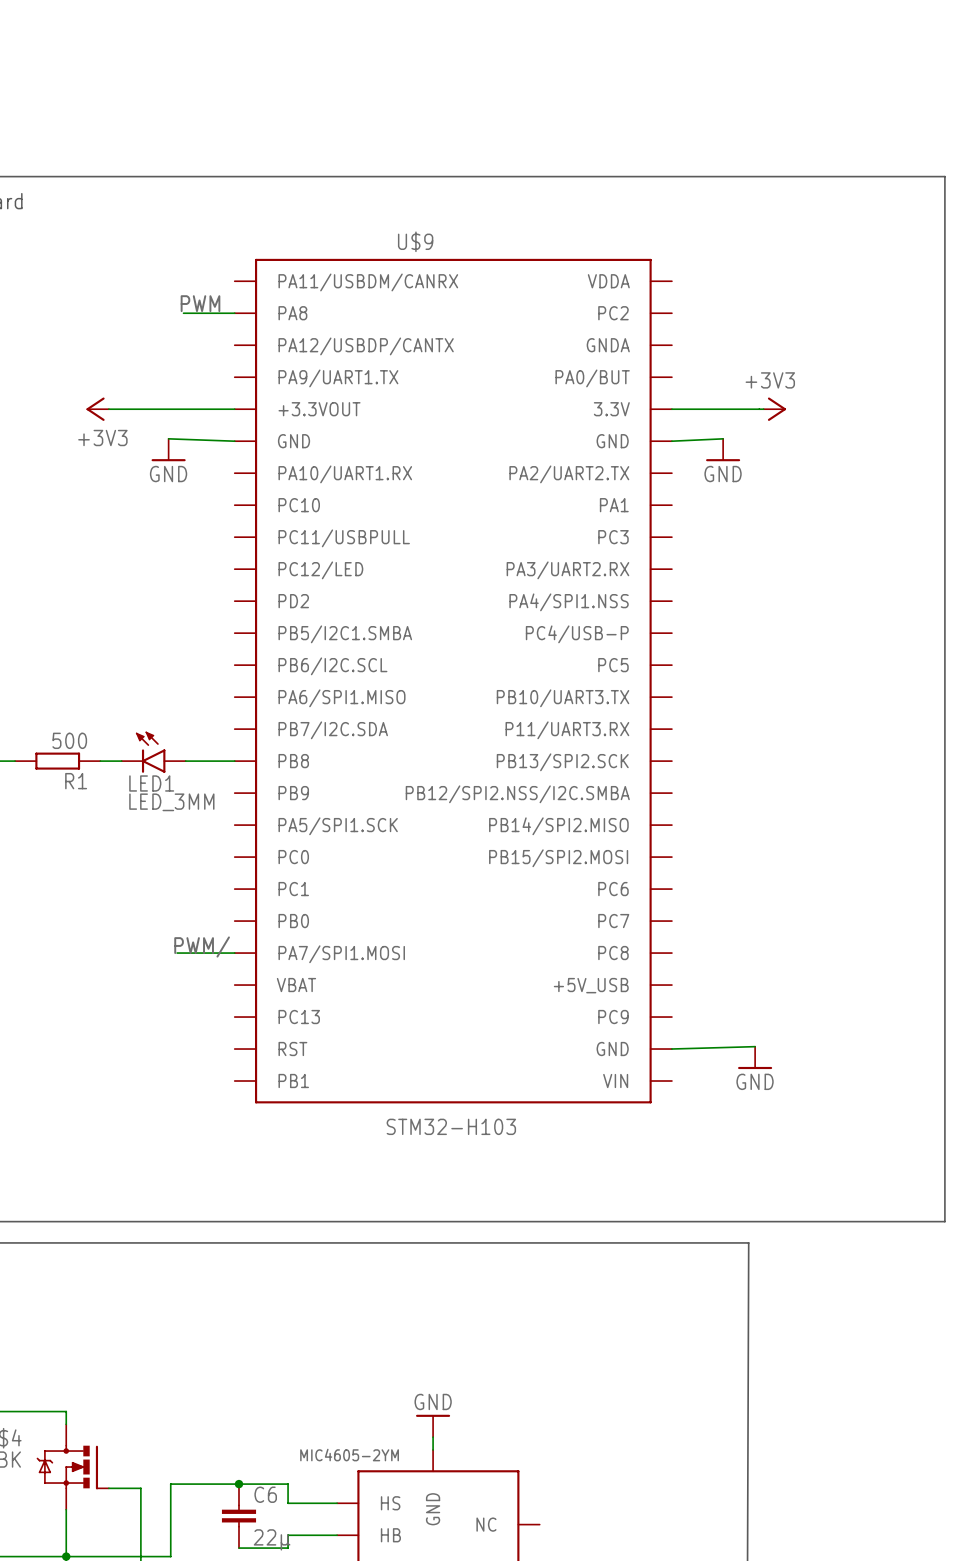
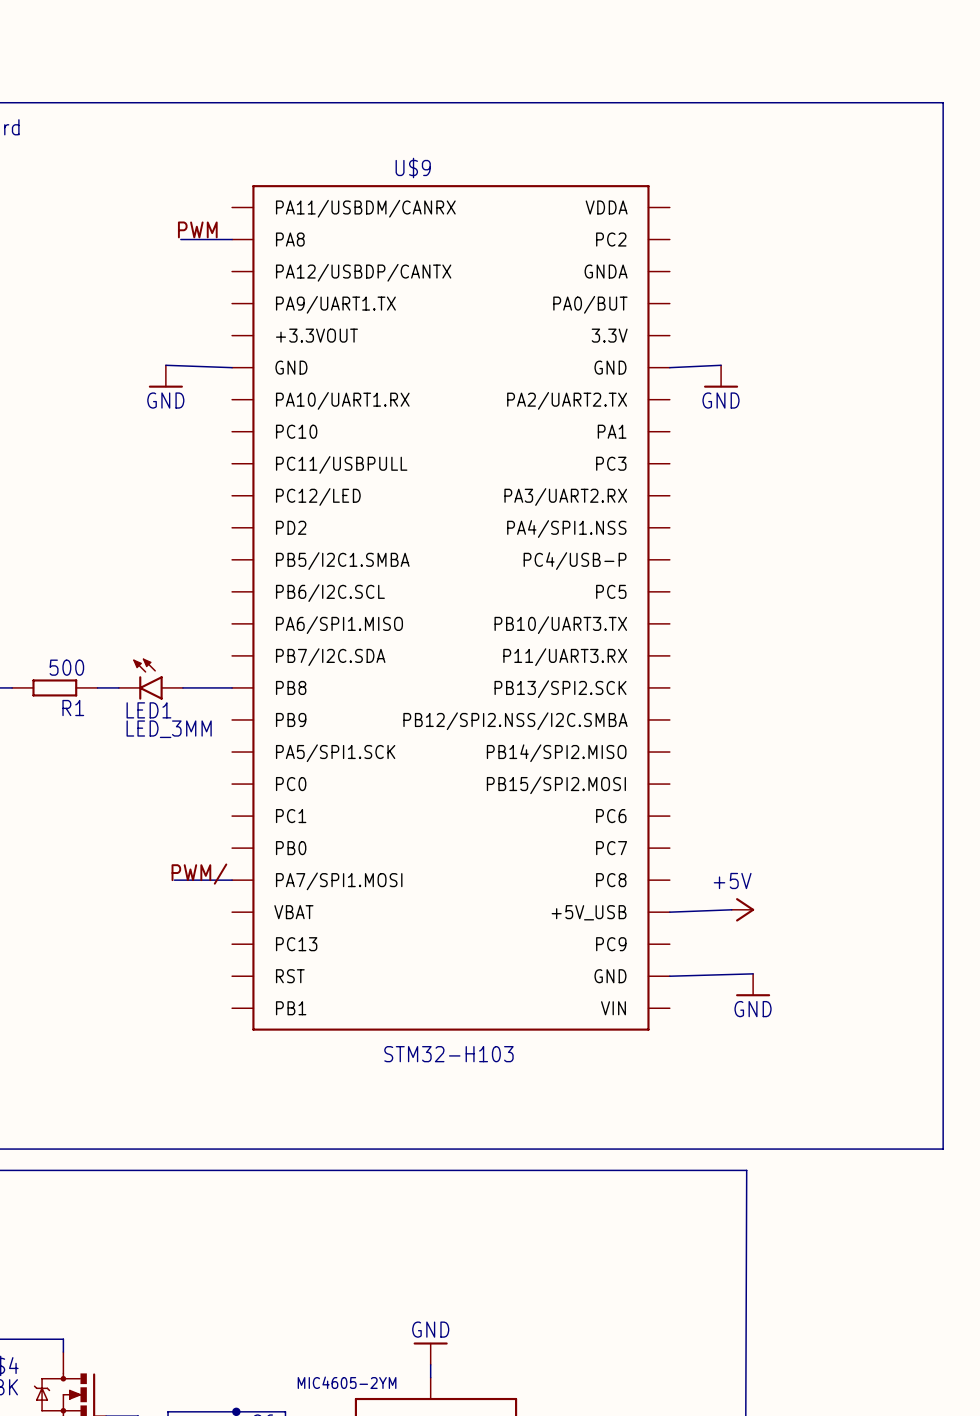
power symbol: +3V3 (97, 409) -> none
wire: (108, 409) (234, 409) -> none
wire: (671, 409) (763, 409) -> none
power symbol: +3V3 (774, 409) -> none
wire: none -> (731, 909) (669, 912)
power symbol: none -> +5V (742, 909)

